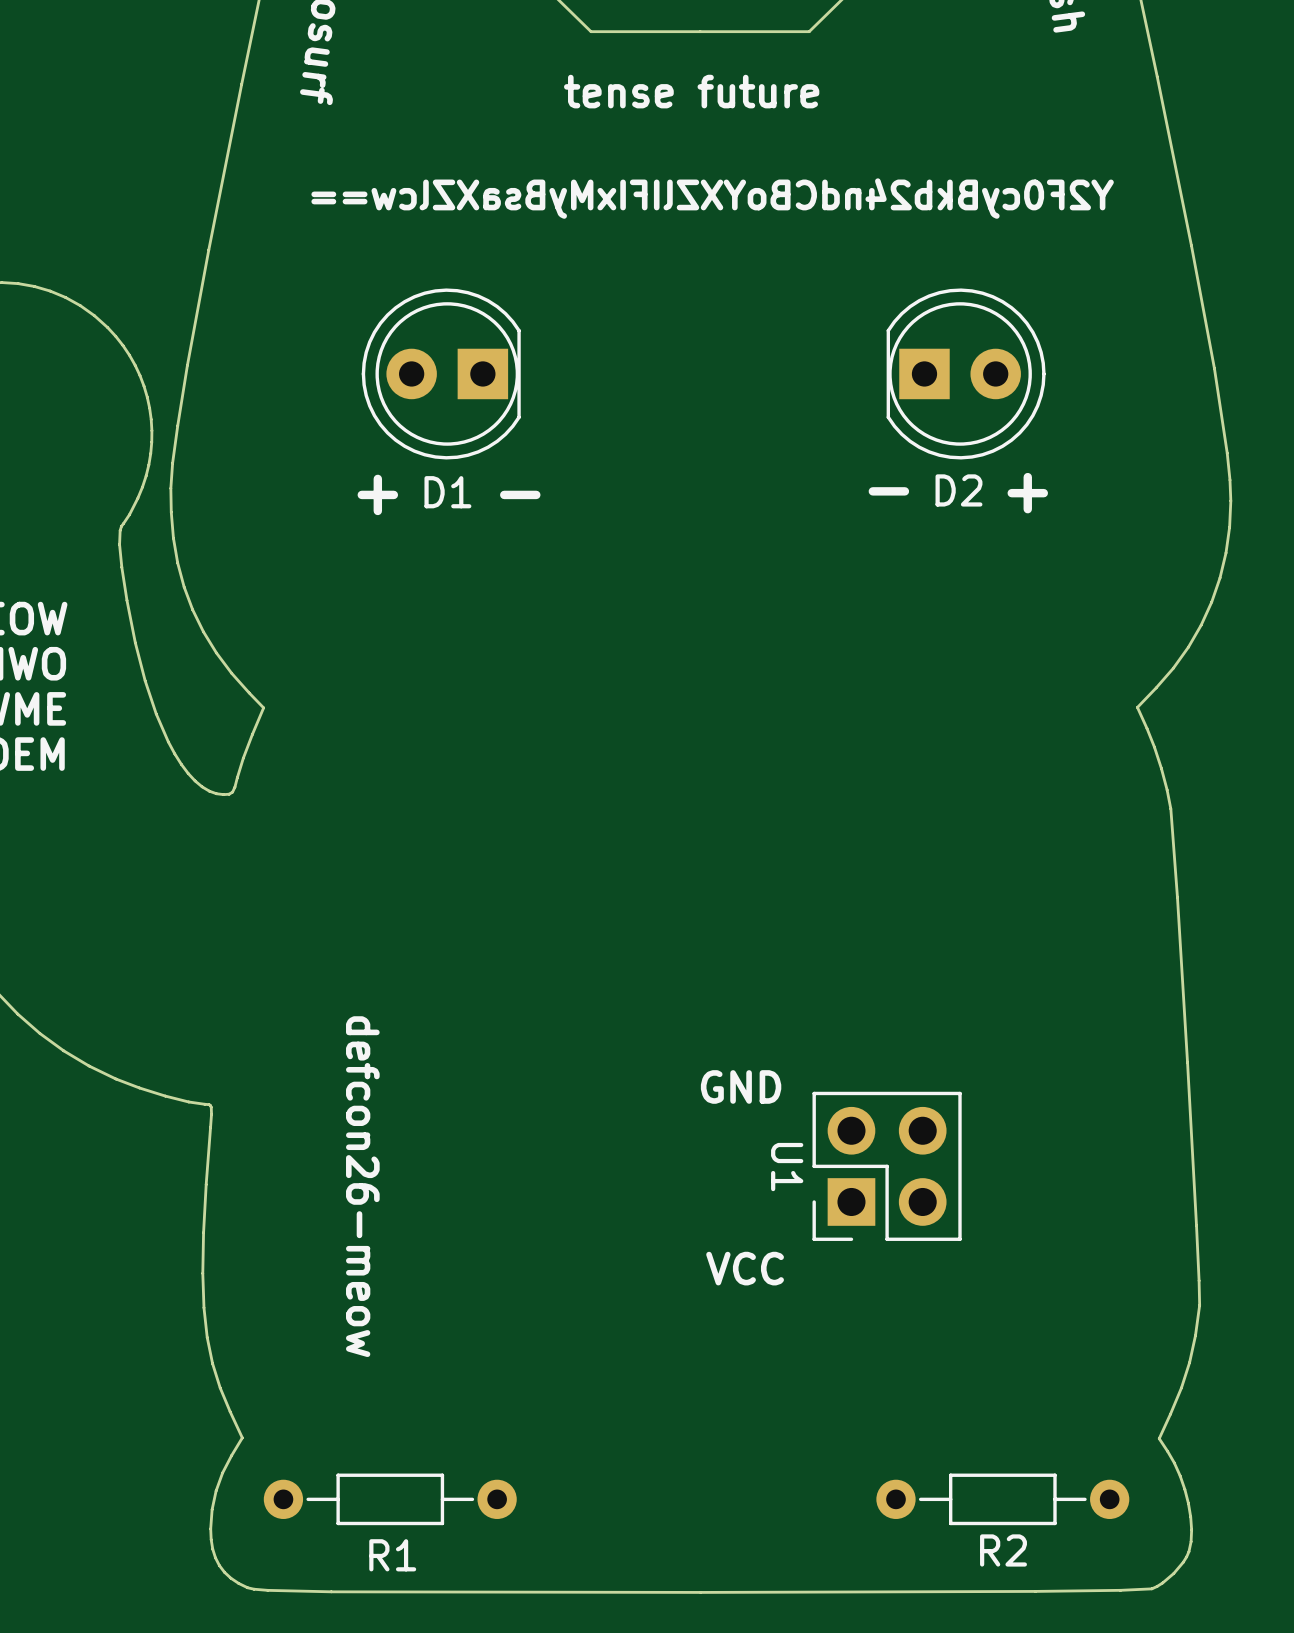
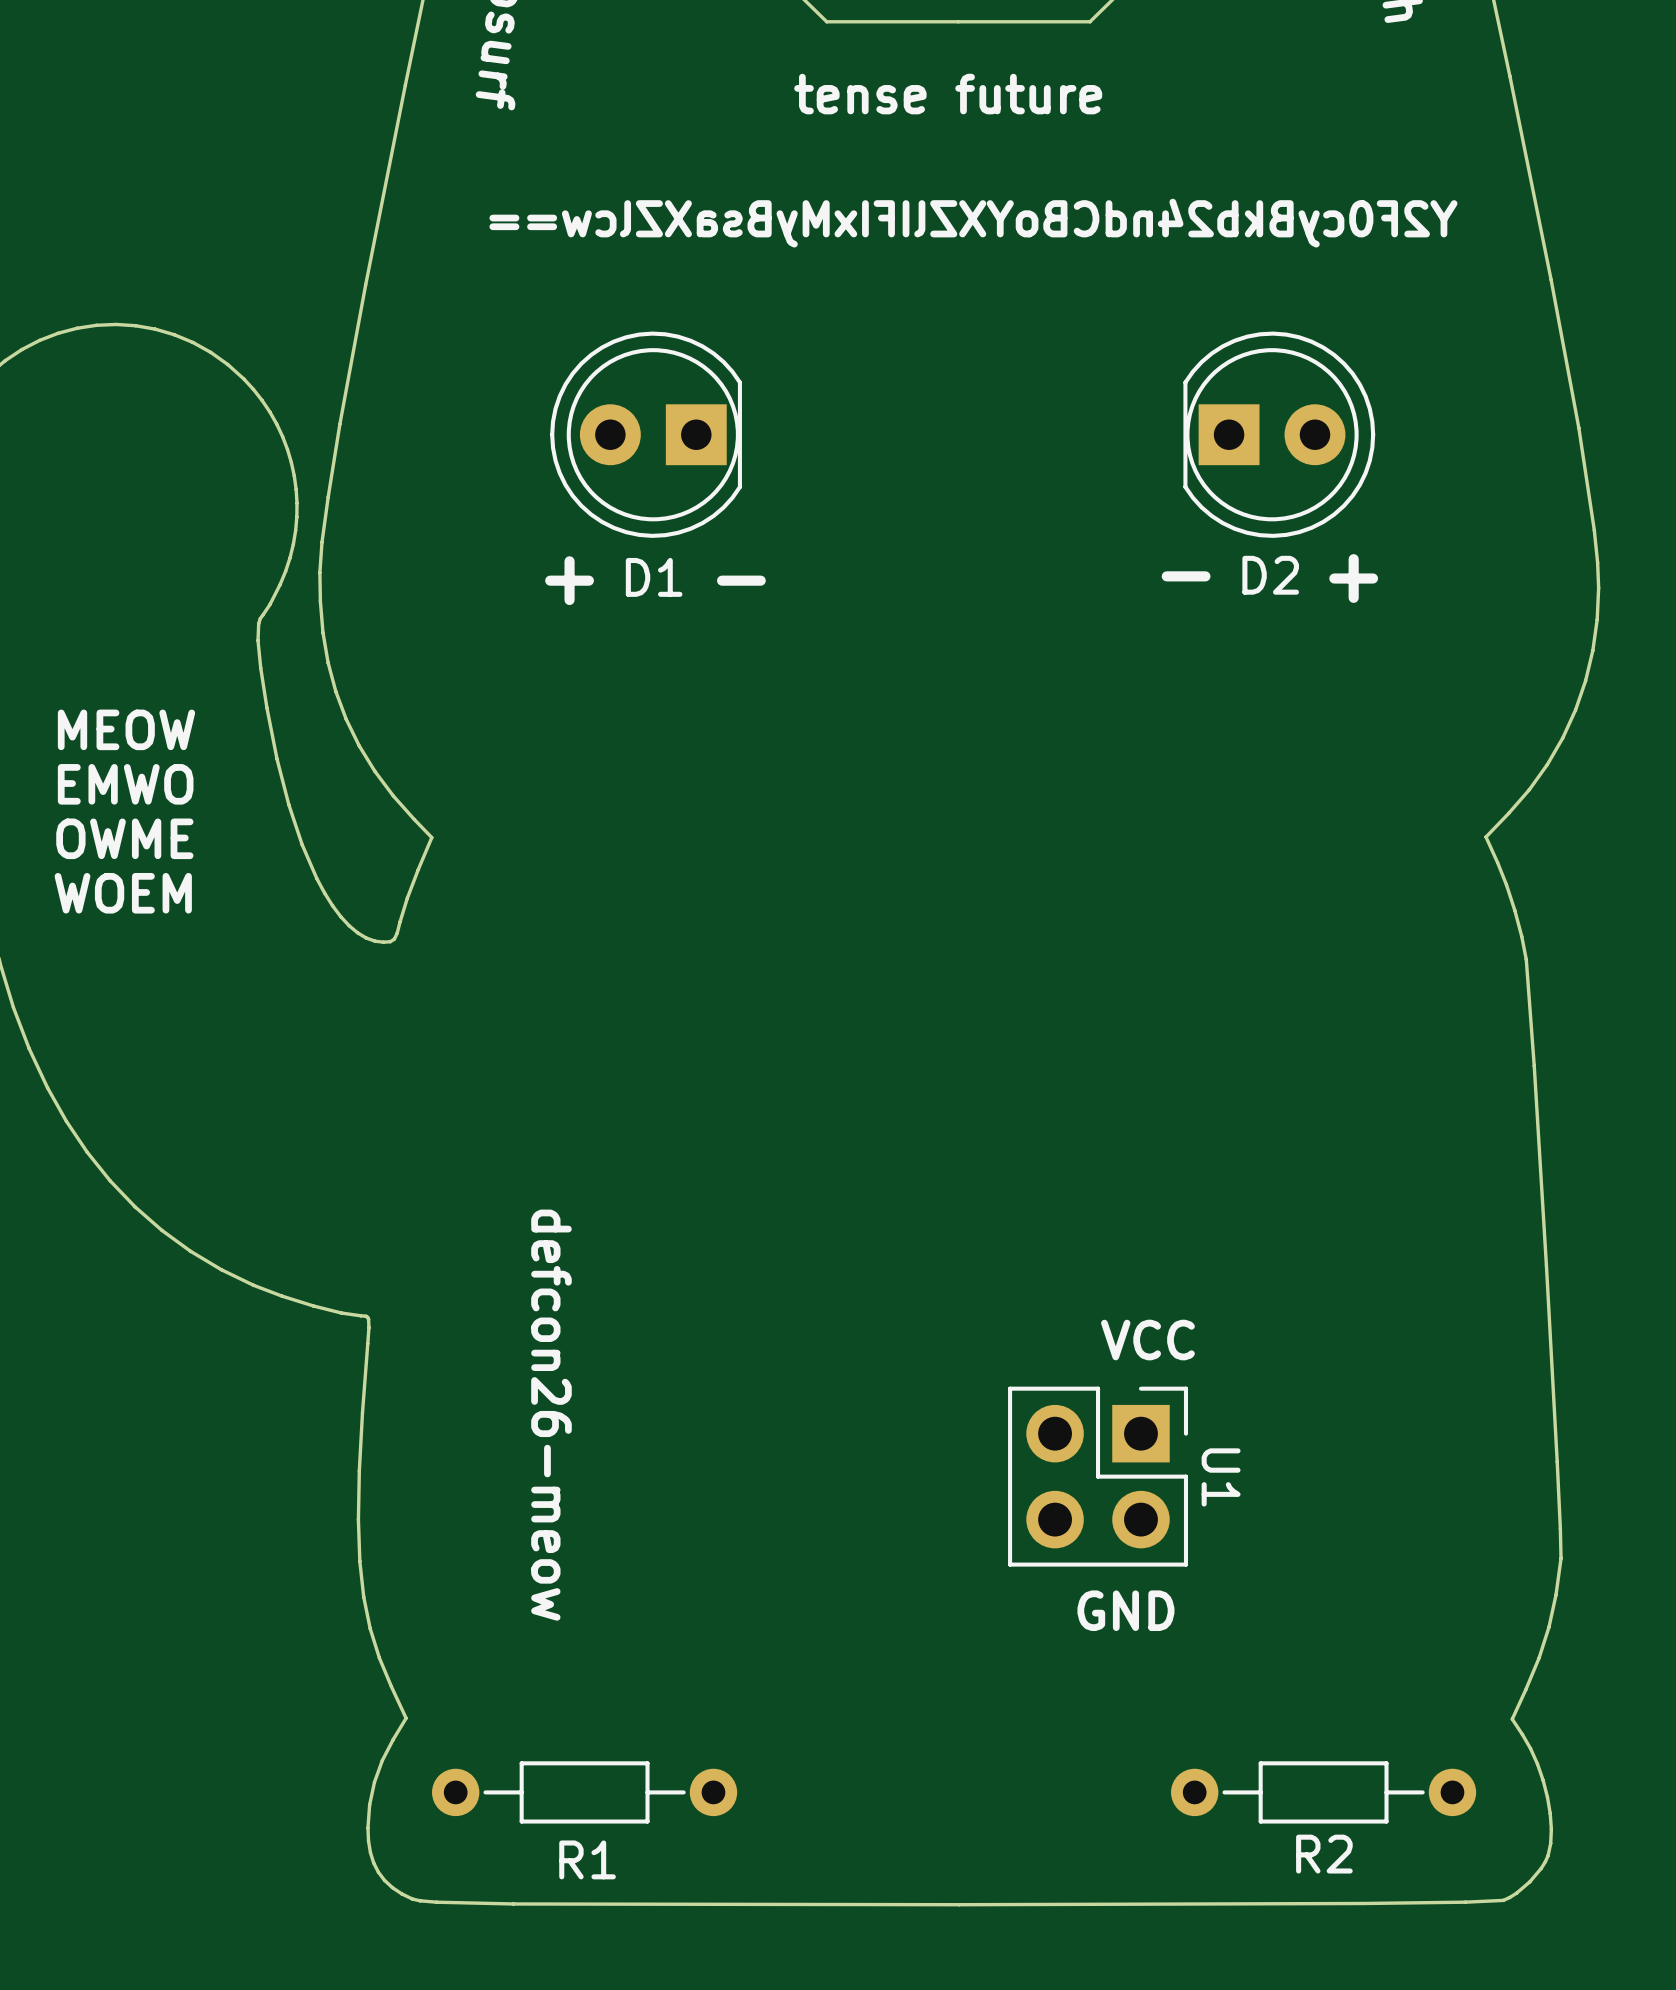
text position: GND (741, 1086) -> GND (1125, 1610)
U1 rotation: 0° (887, 1166) -> 180° (1098, 1476)
U1 position: (887, 1166) -> (1098, 1476)
text position: VCC (745, 1268) -> VCC (1147, 1340)

